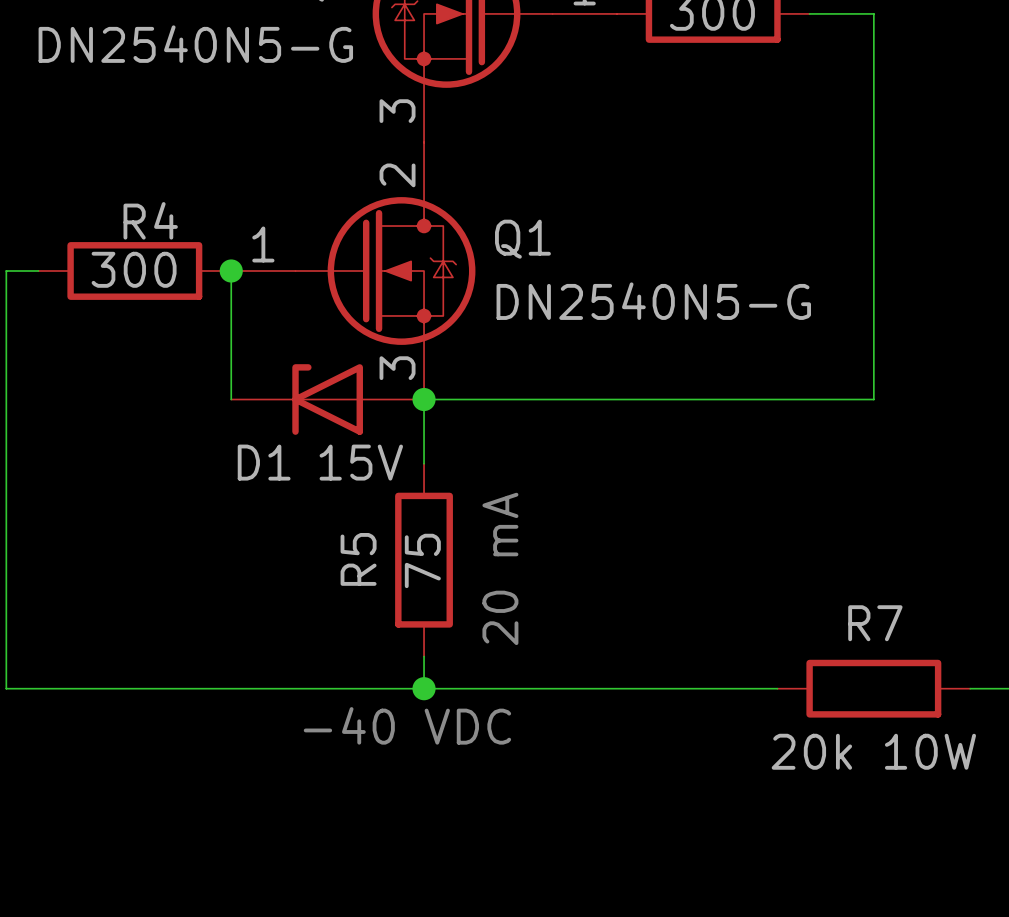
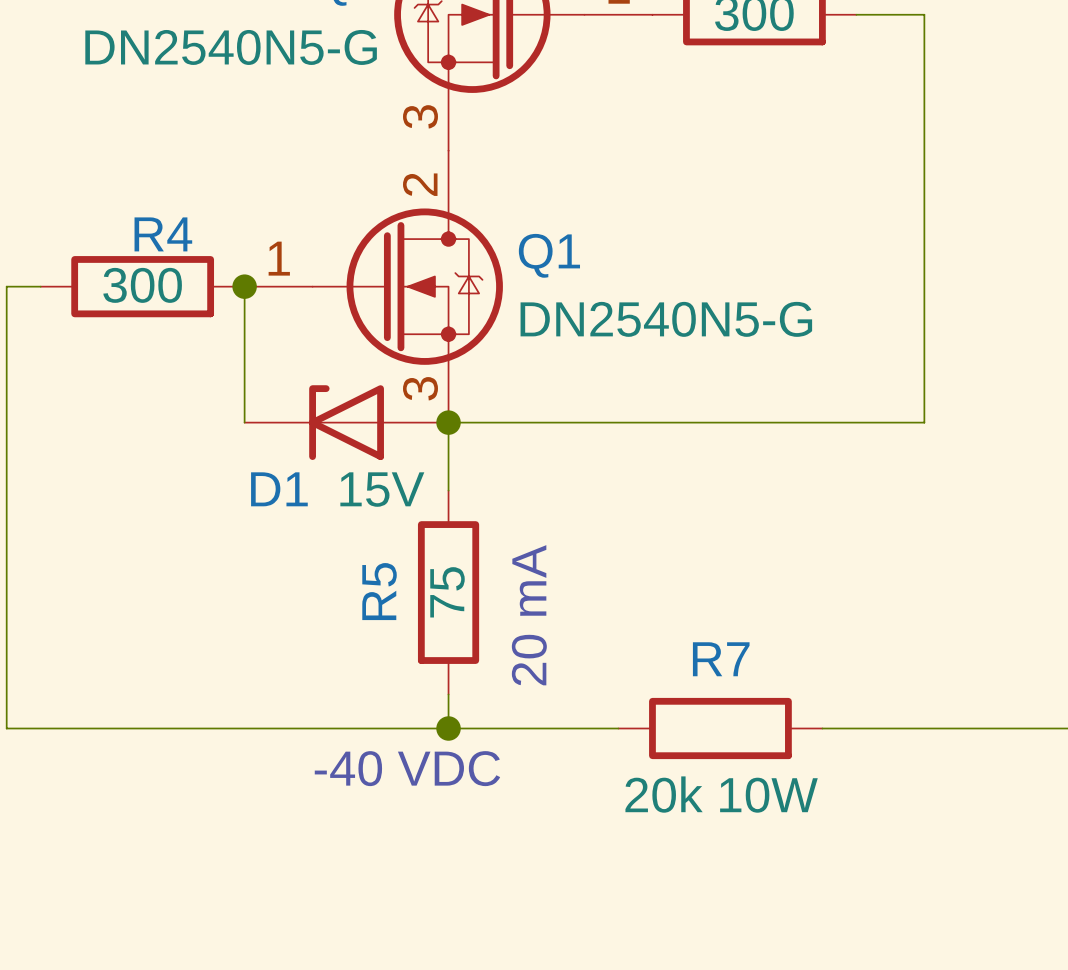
wire: (584, 688) (777, 688) -> (1026, 728) (822, 728)
R7 position: (873, 688) -> (720, 728)

